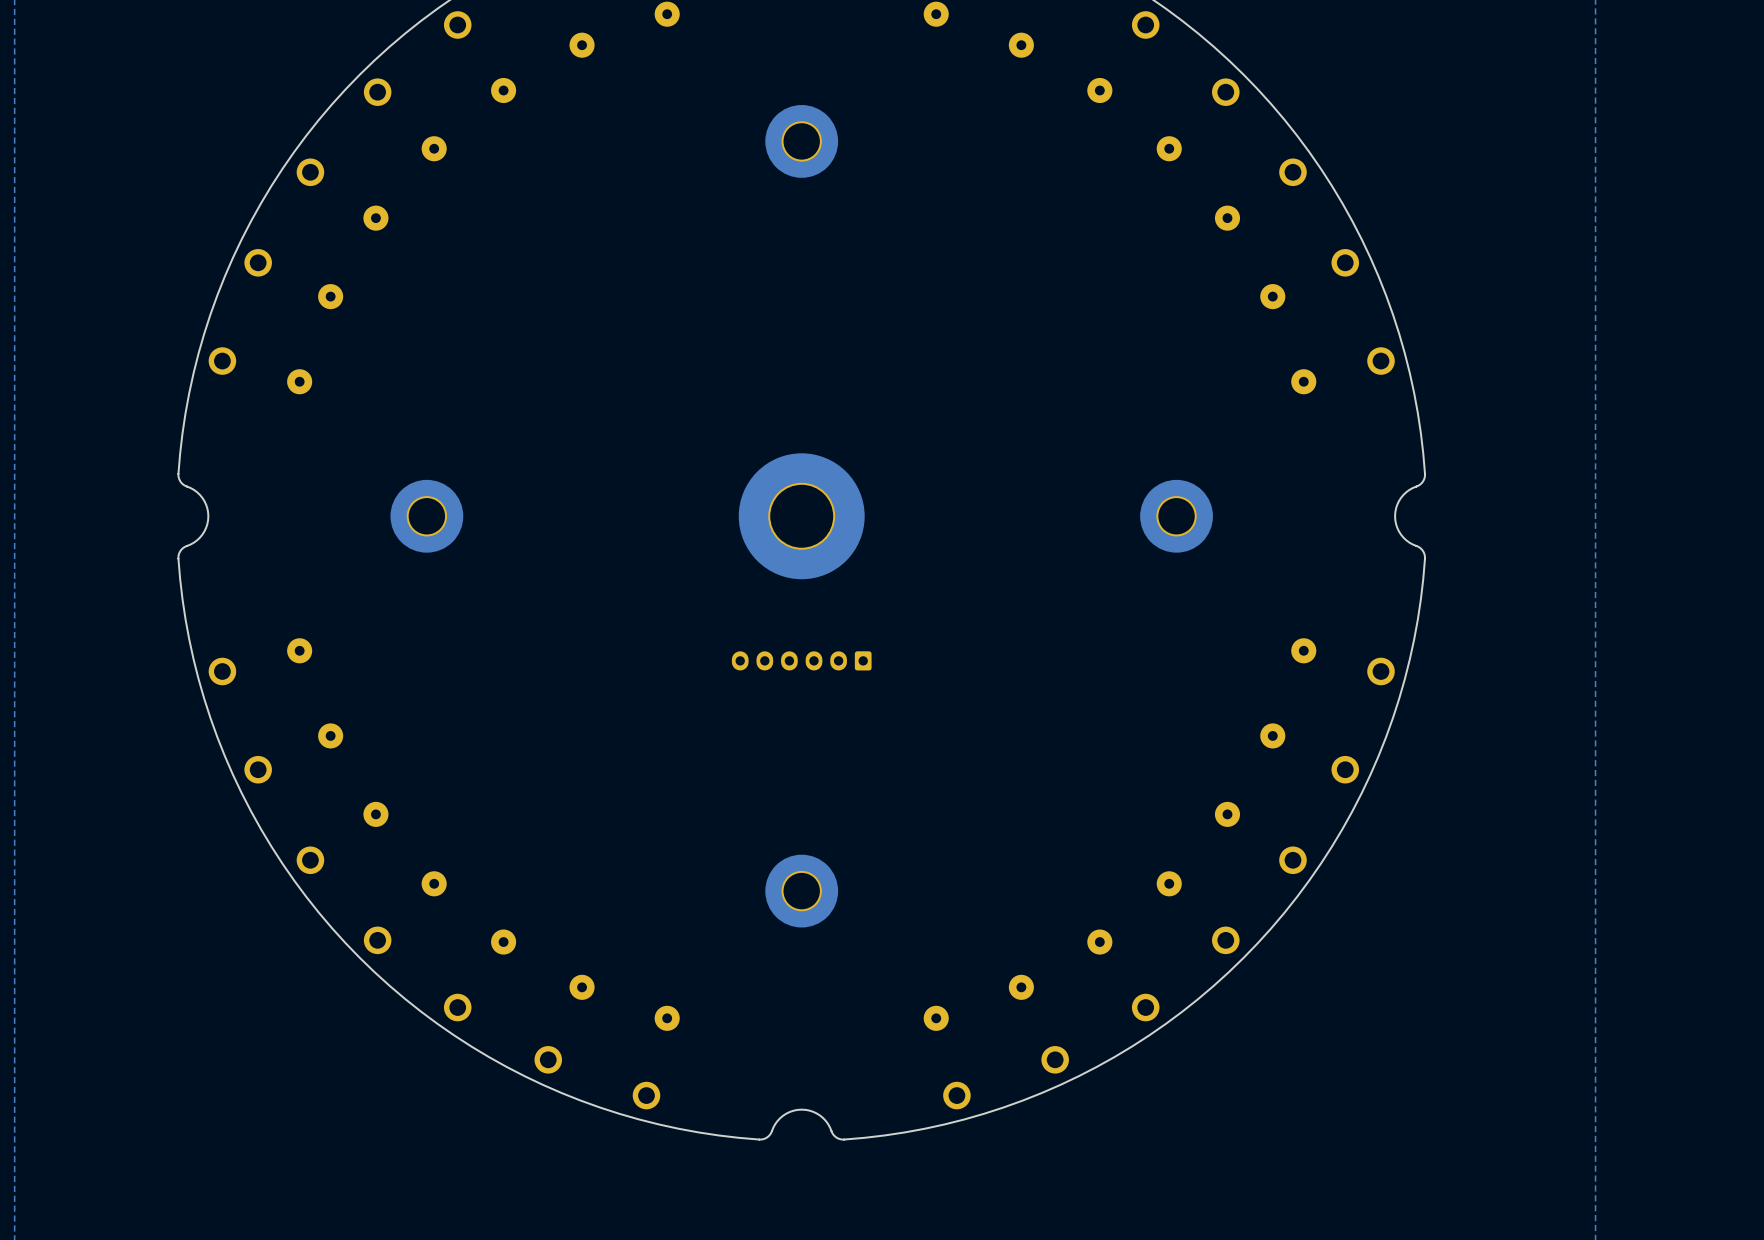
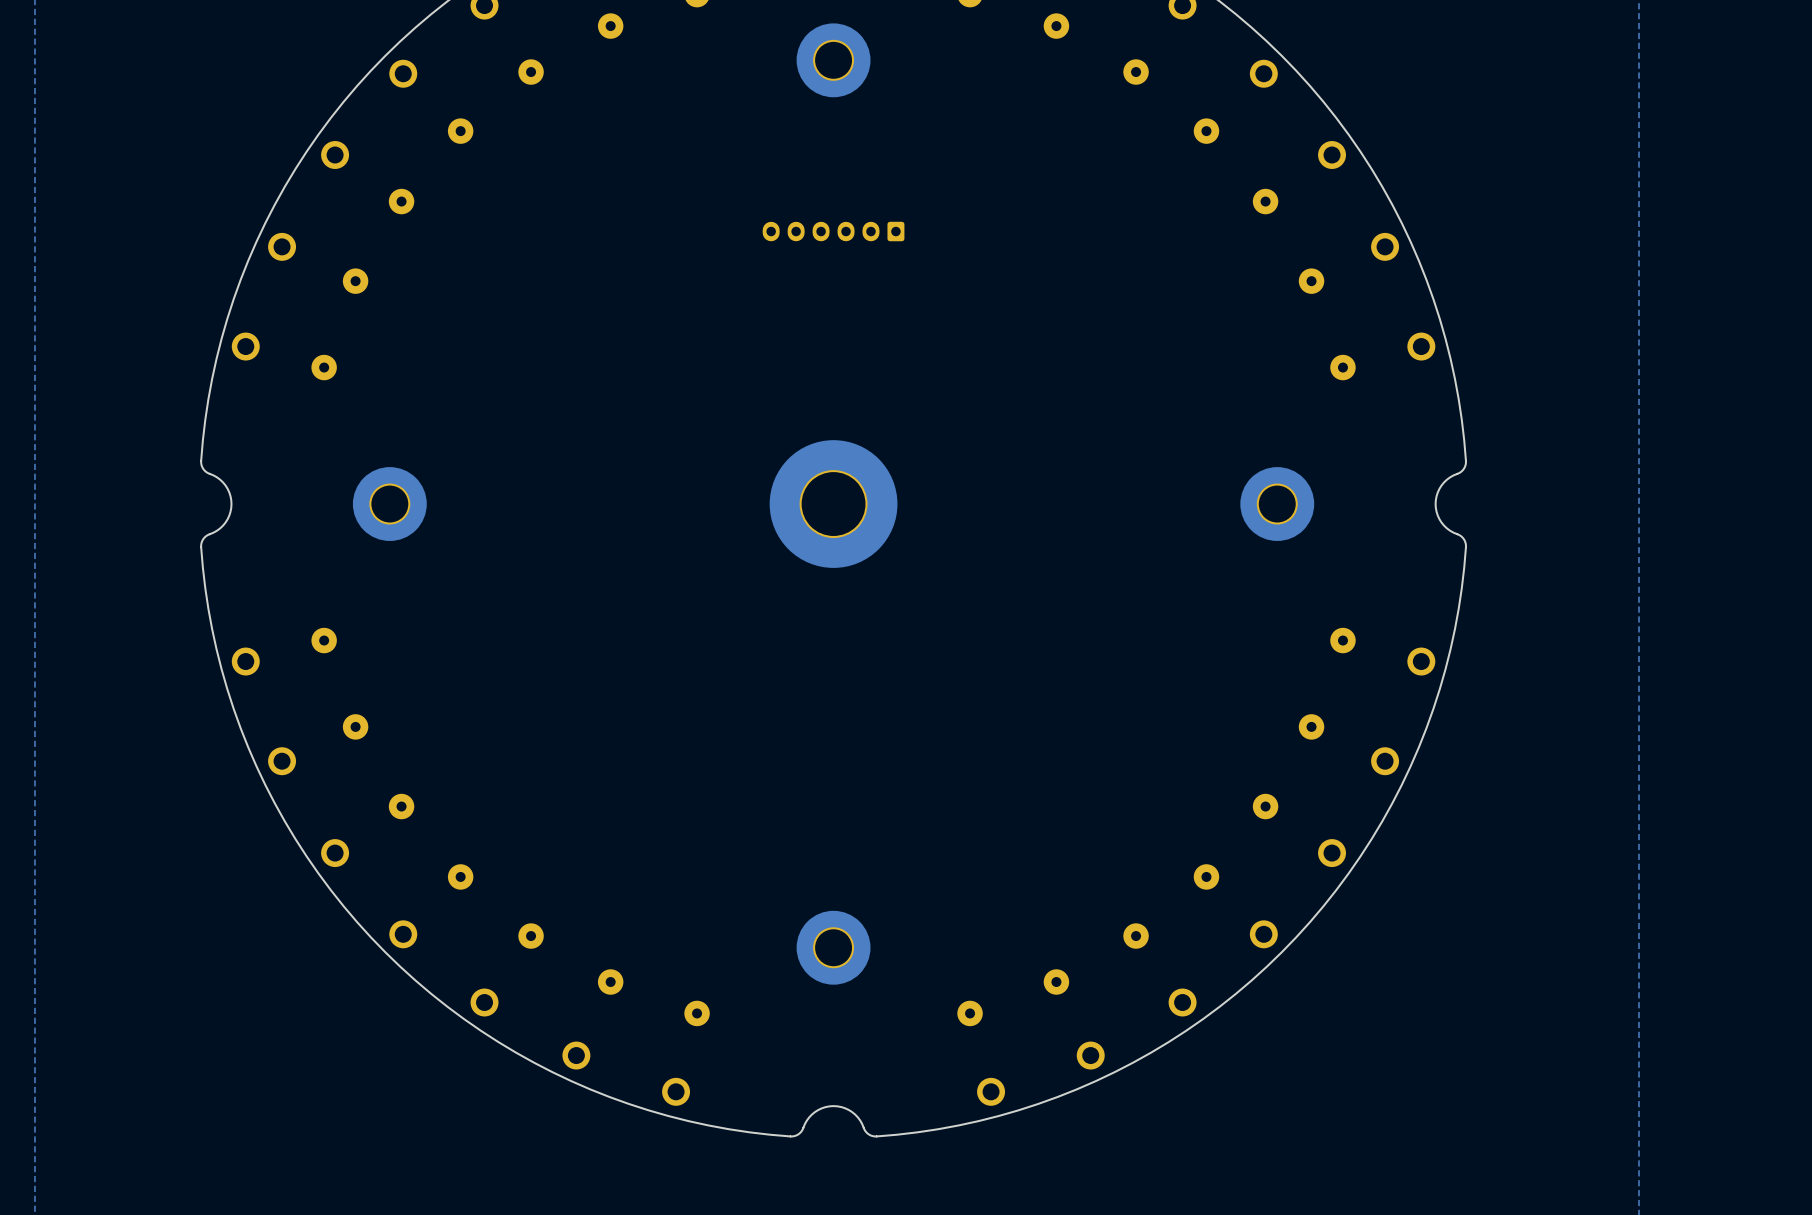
part position: (801, 141) -> (833, 60)
part: none -> (833, 231)
part position: (426, 516) -> (389, 504)
part position: (1176, 516) -> (1277, 504)
part: (801, 660) -> none
part position: (801, 891) -> (833, 947)

